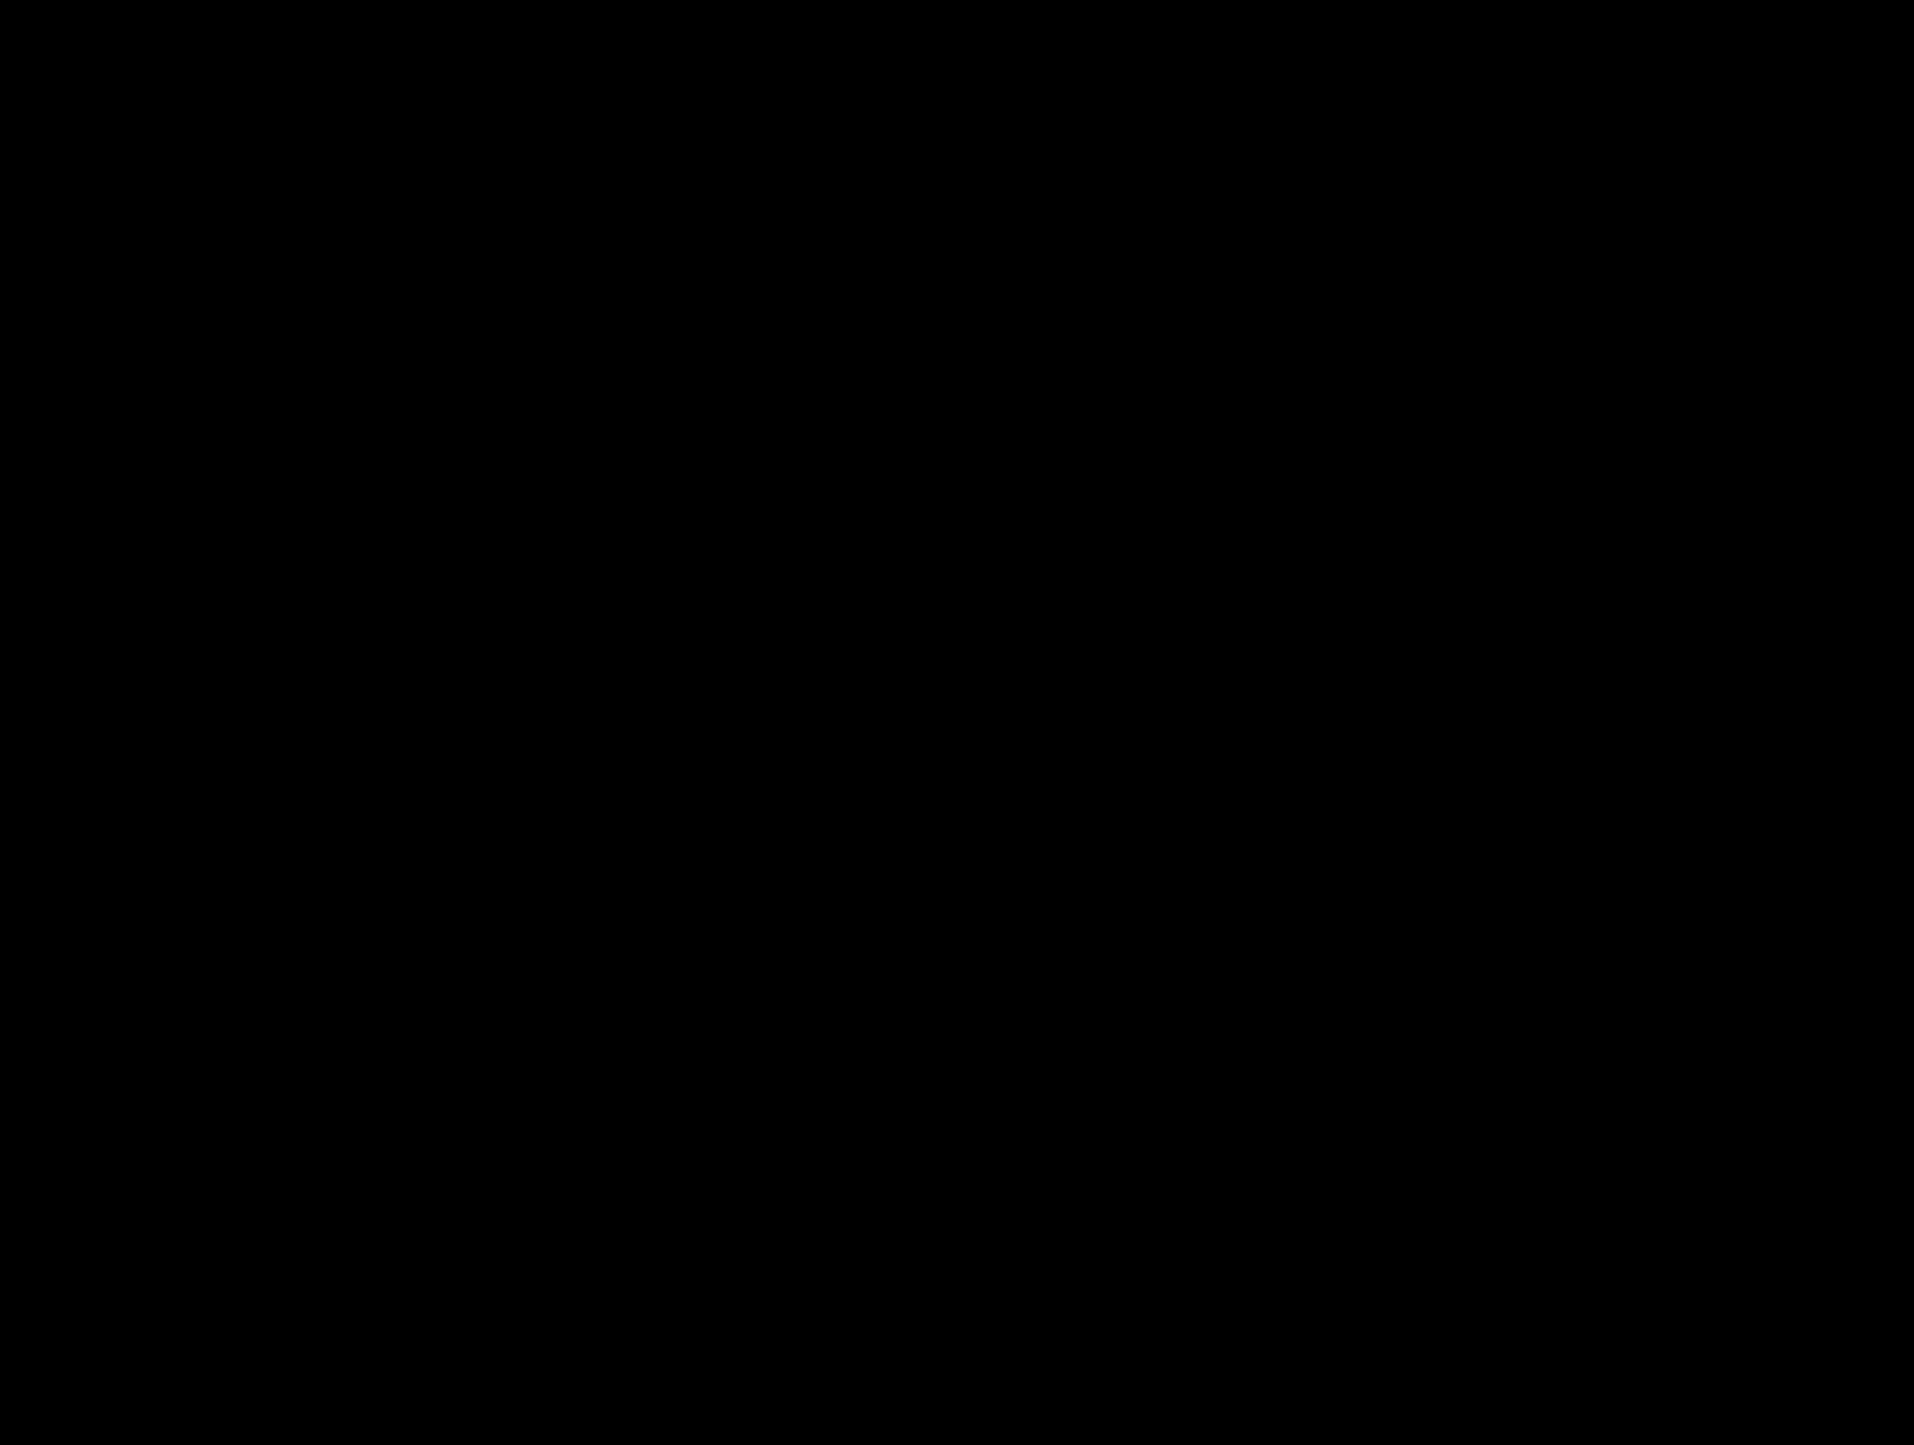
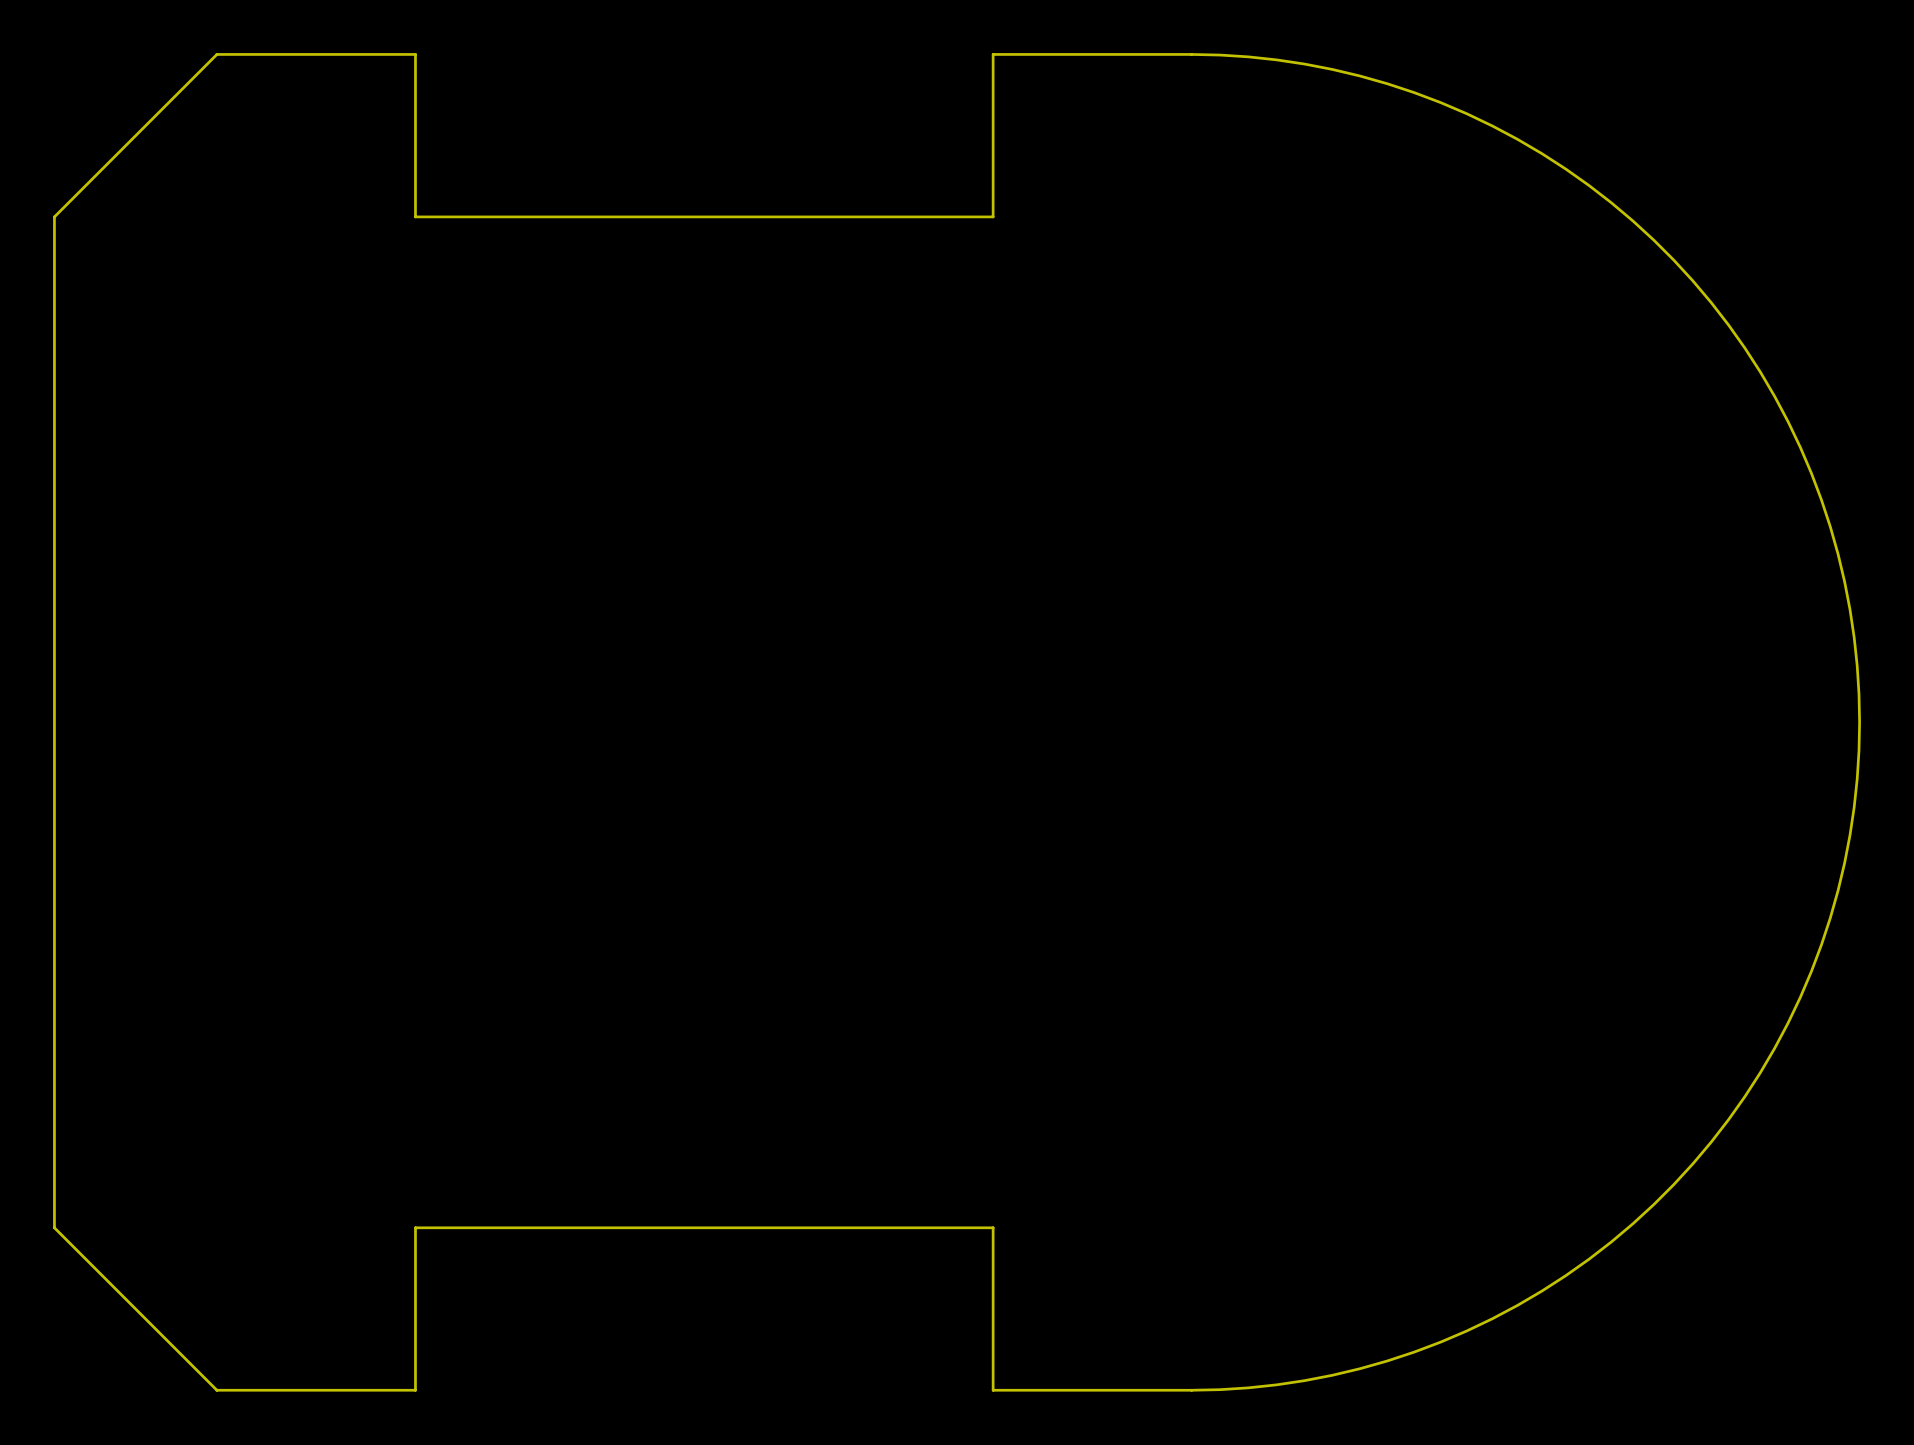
board edge: none -> (1191, 54) (993, 54) (993, 216) (415, 216) (415, 54) (216, 54) (54, 216) (54, 1227) (216, 1390) (415, 1390) (415, 1227) (993, 1227) (993, 1390) (1220, 1389) (1304, 1380) (1359, 1368) (1414, 1352) (1492, 1318) (1541, 1291) (1588, 1259) (1632, 1223) (1673, 1184) (1728, 1119) (1774, 1048) (1811, 971) (1838, 890) (1849, 835) (1857, 779) (1859, 694) (1849, 609) (1838, 554) (1821, 499) (1788, 421) (1745, 348) (1693, 281) (1653, 240) (1611, 202) (1541, 153) (1492, 125) (1440, 102) (1359, 76) (1276, 59) (1191, 54)

